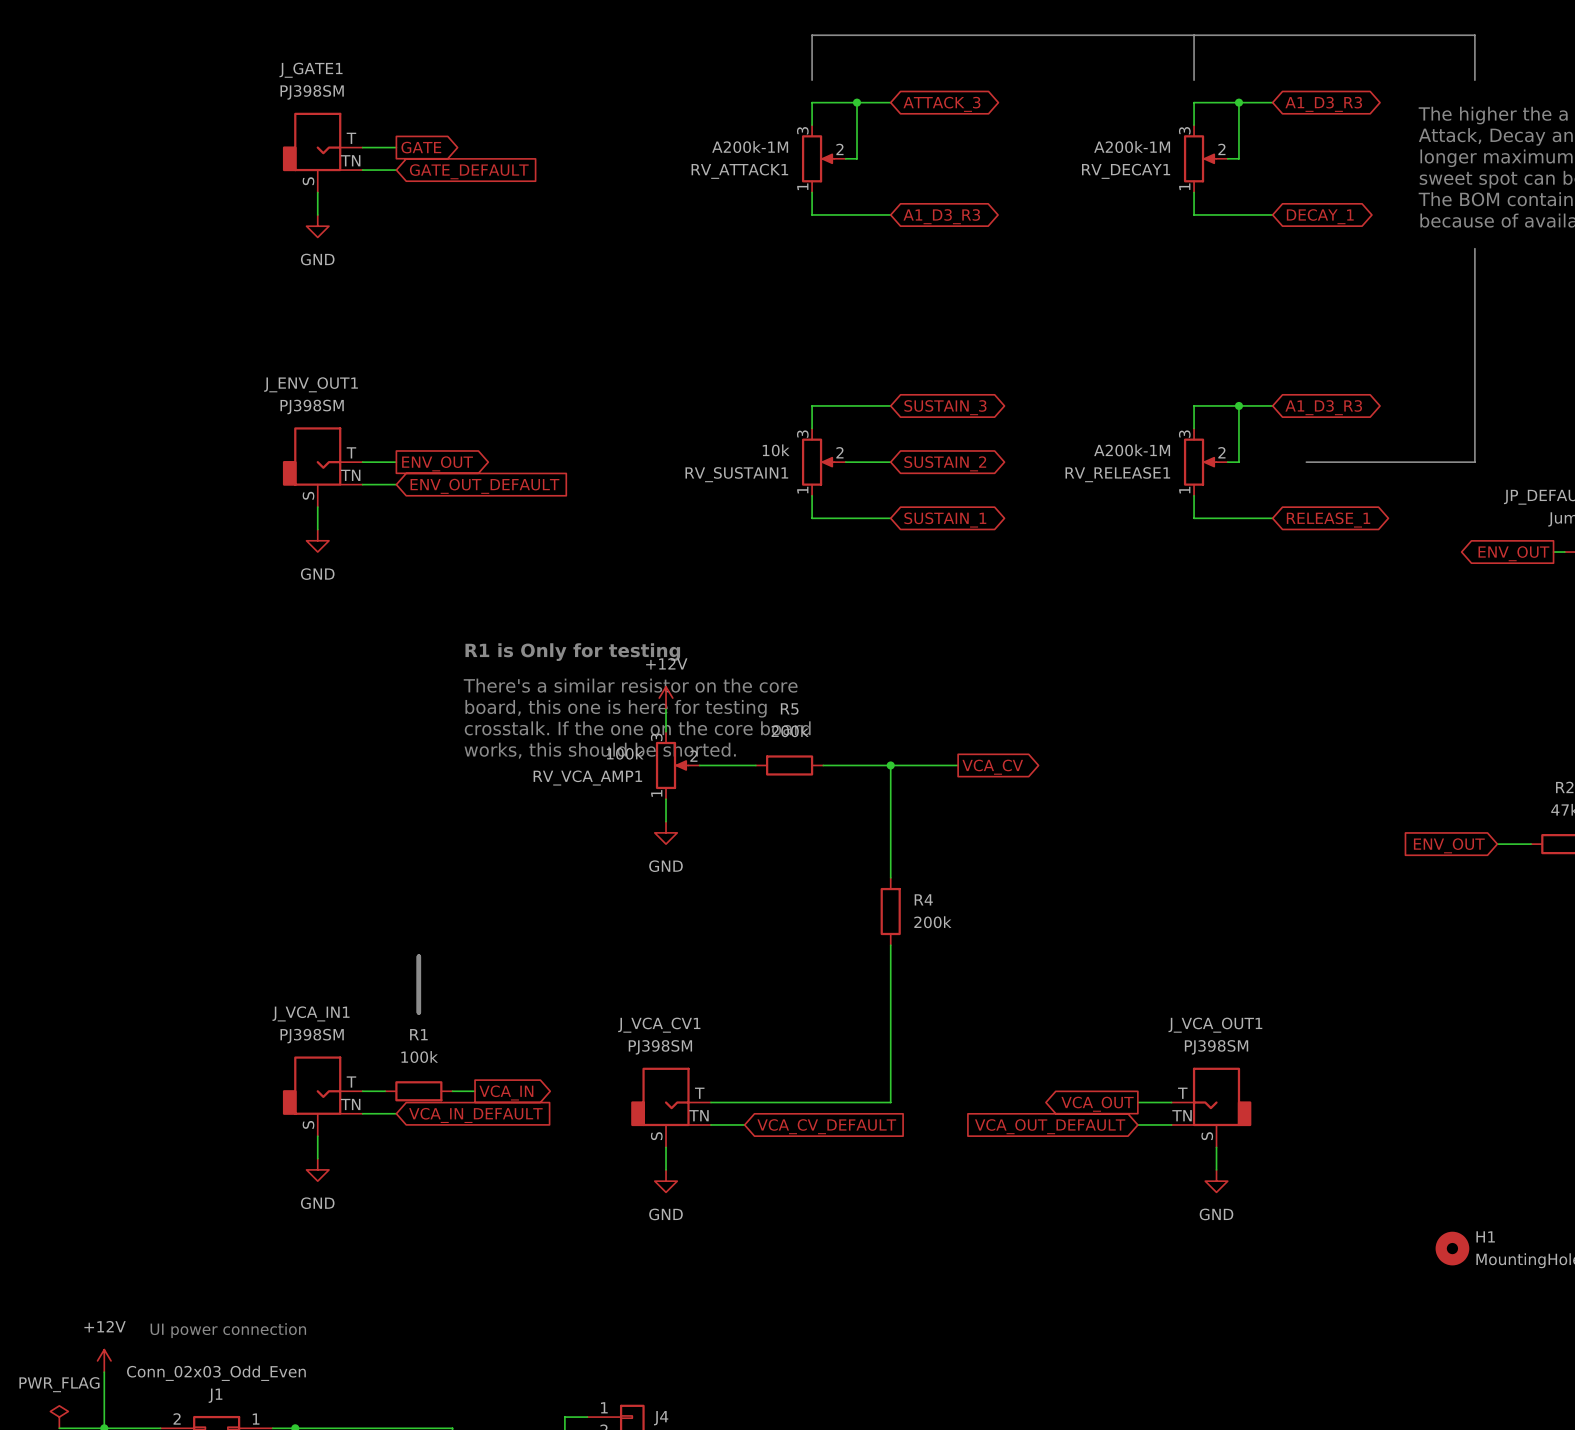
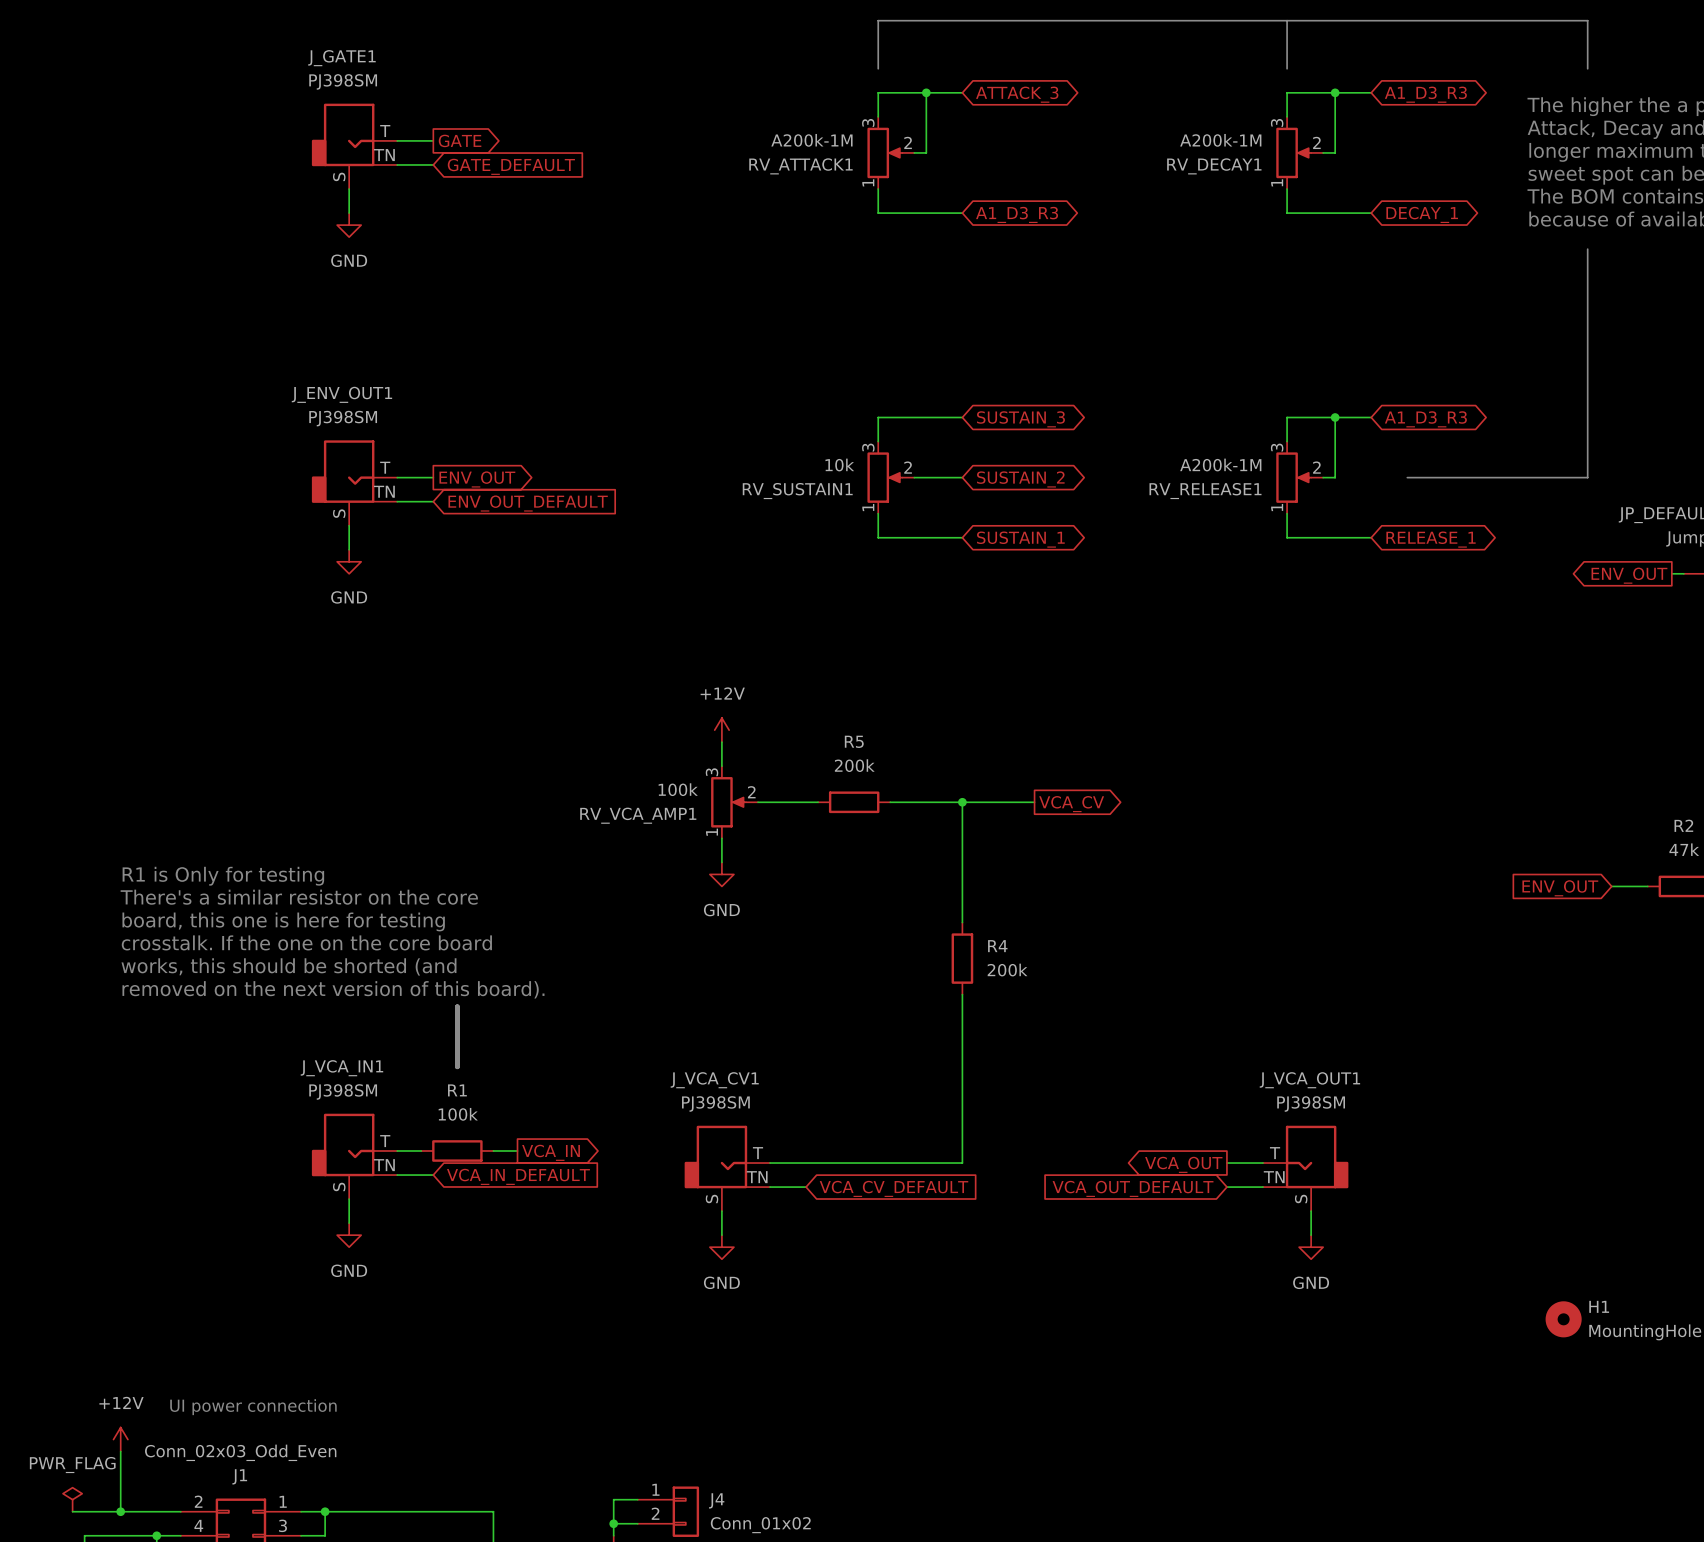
text: R1 is Only for testing (572, 652) -> none
text: There's a similar resistor on the core (630, 685) -> none
text: board, this one is here for testing (616, 708) -> none
text: crosstalk. If the one on the core board (637, 728) -> none
text: works, this should be shorted. (600, 750) -> none
text: none -> R1 is Only for testing (223, 876)
text: none -> There's a similar resistor on the core (299, 897)
text: none -> board, this one is here for testing (283, 921)
text: none -> crosstalk. If the one on the core board (306, 942)
text: none -> works, this should be shorted (and (288, 966)
text: none -> removed on the next version of this board). (333, 989)

